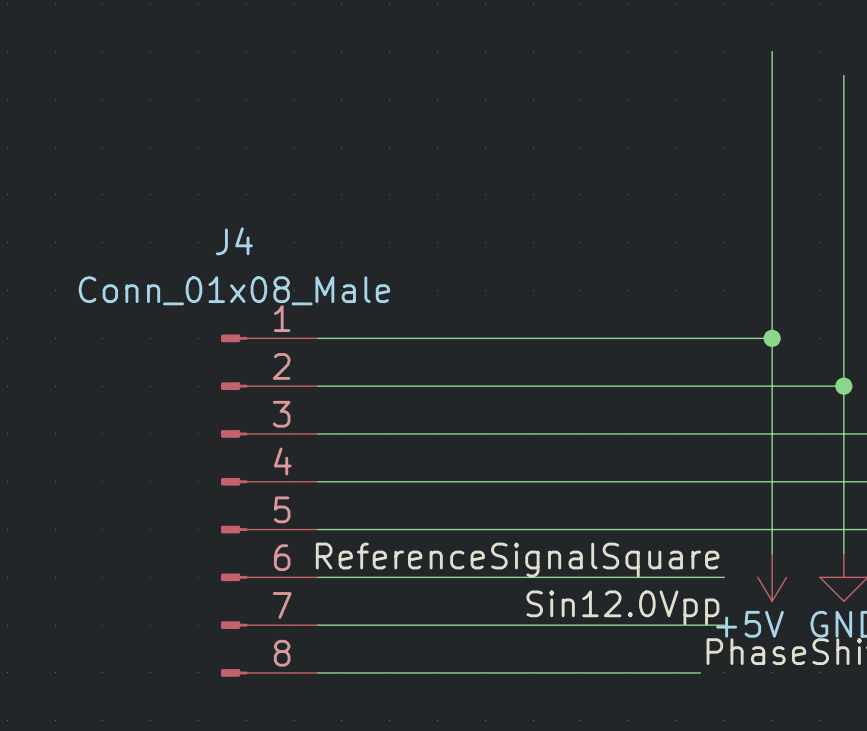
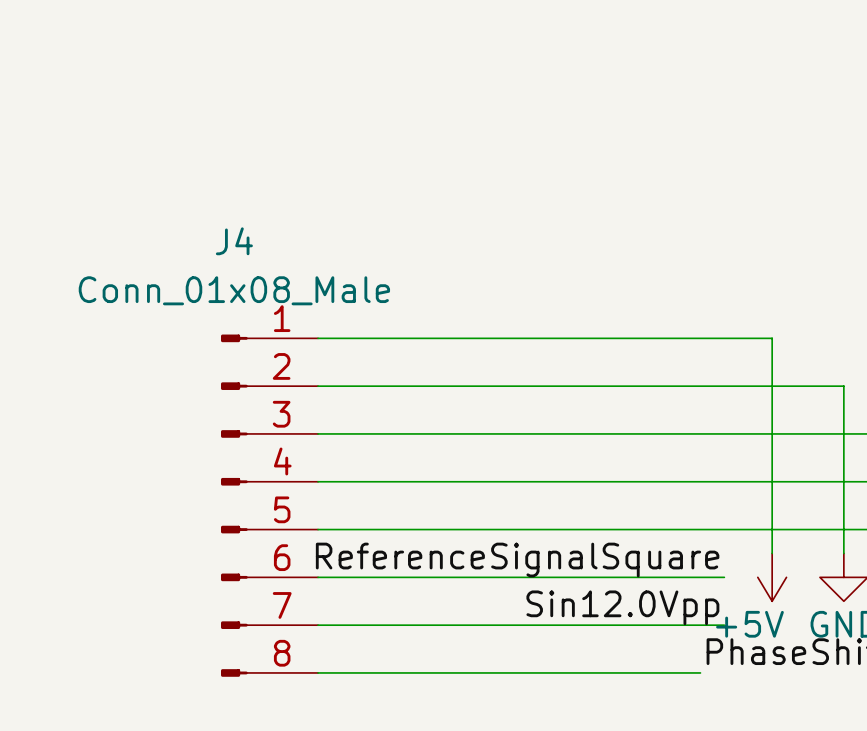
wire: (772, 51) (772, 338) -> none
wire: (843, 75) (843, 386) -> none
junction: (772, 338) -> none
junction: (843, 386) -> none

